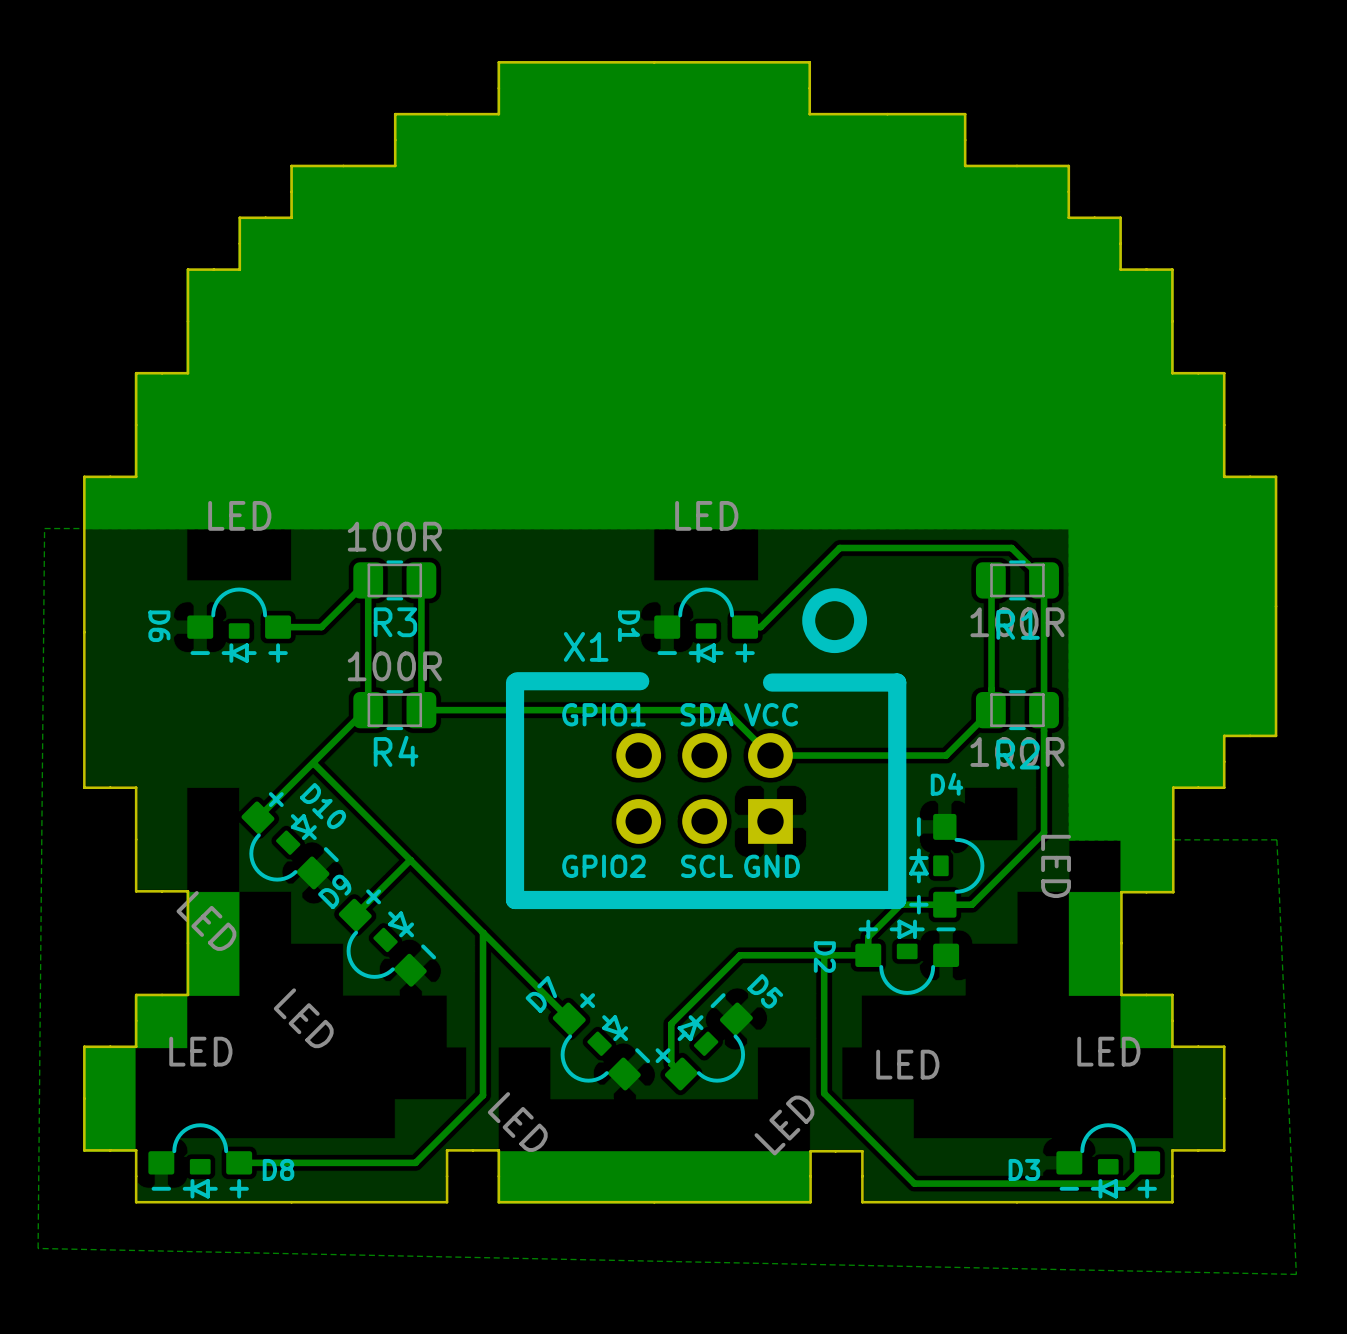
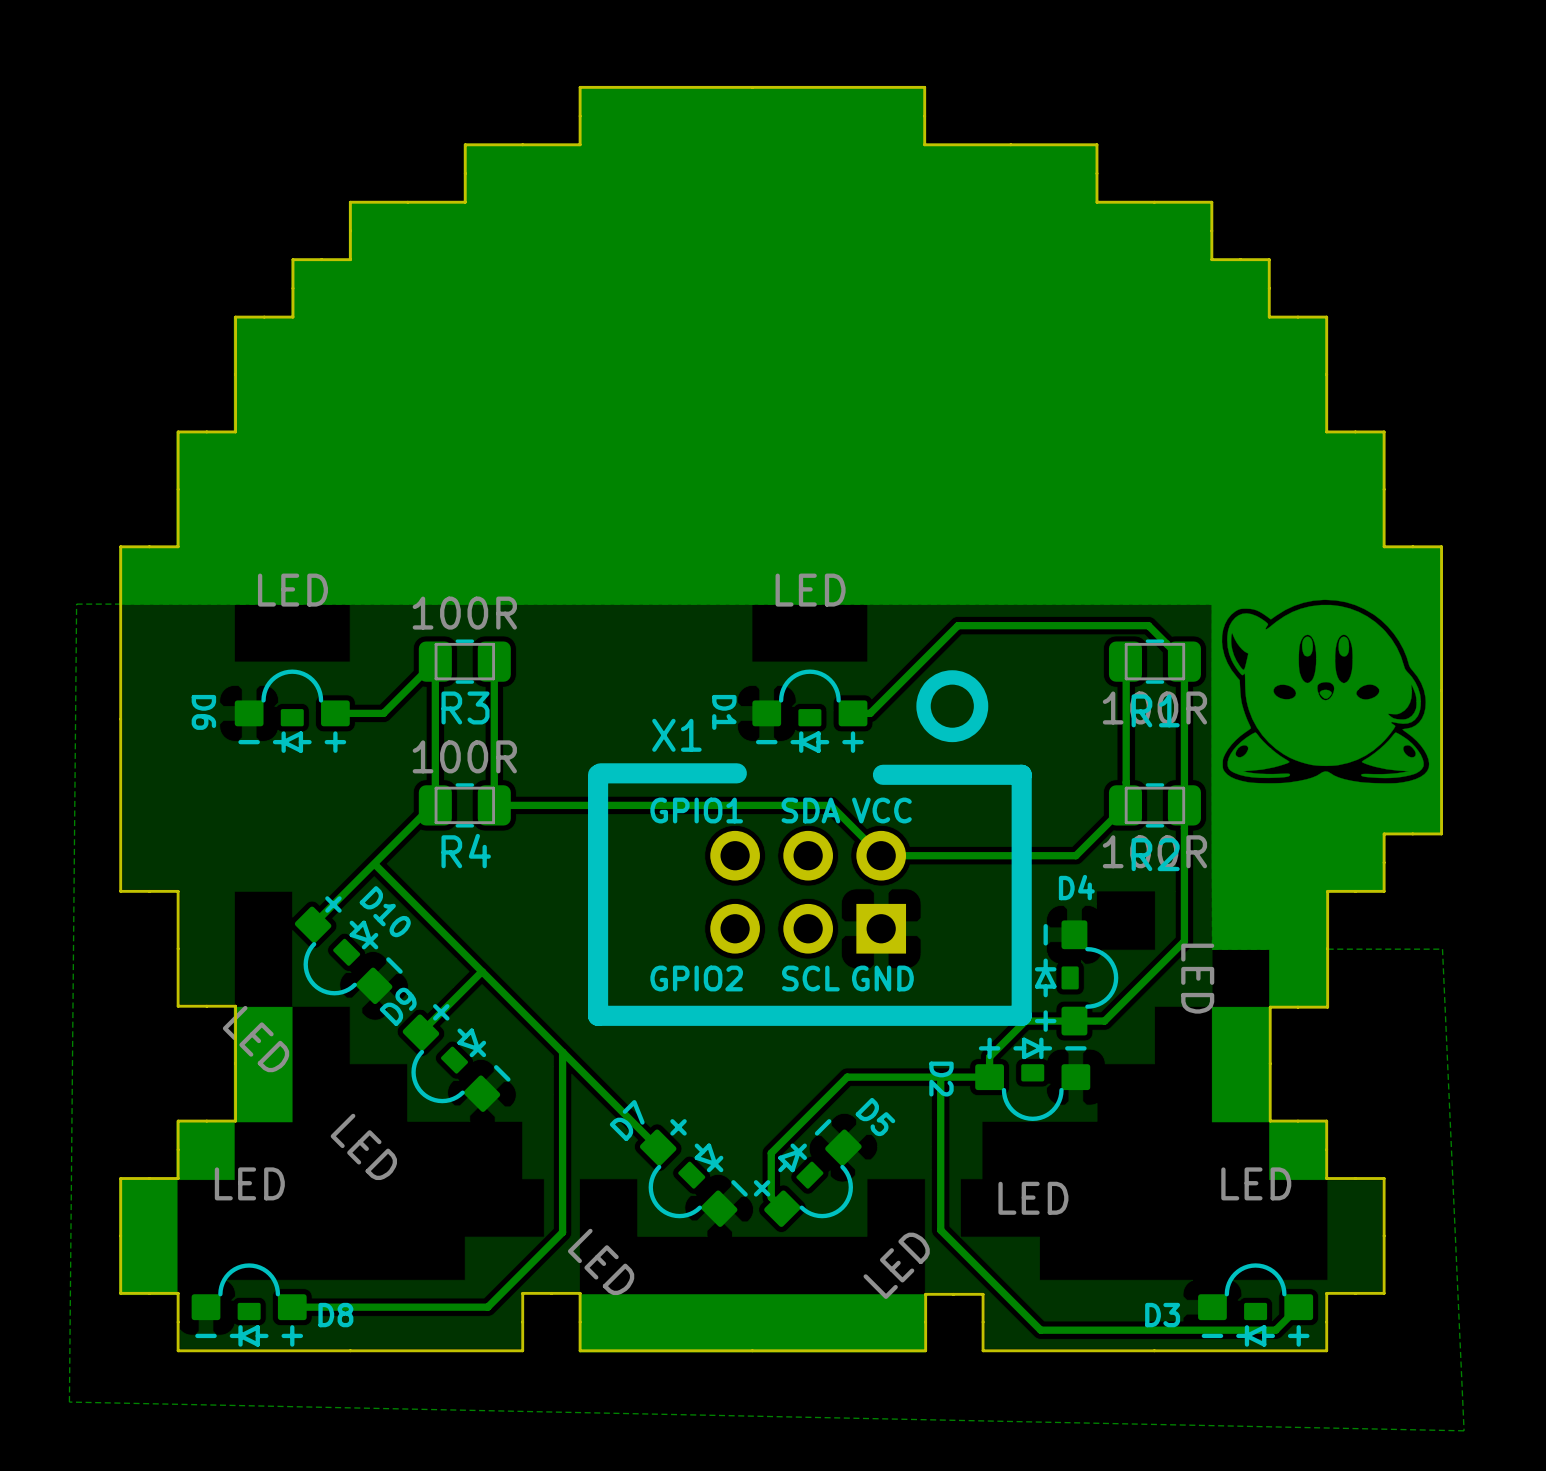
drawing shape: [83, 61, 1277, 1204] -> [119, 86, 1443, 1353]

